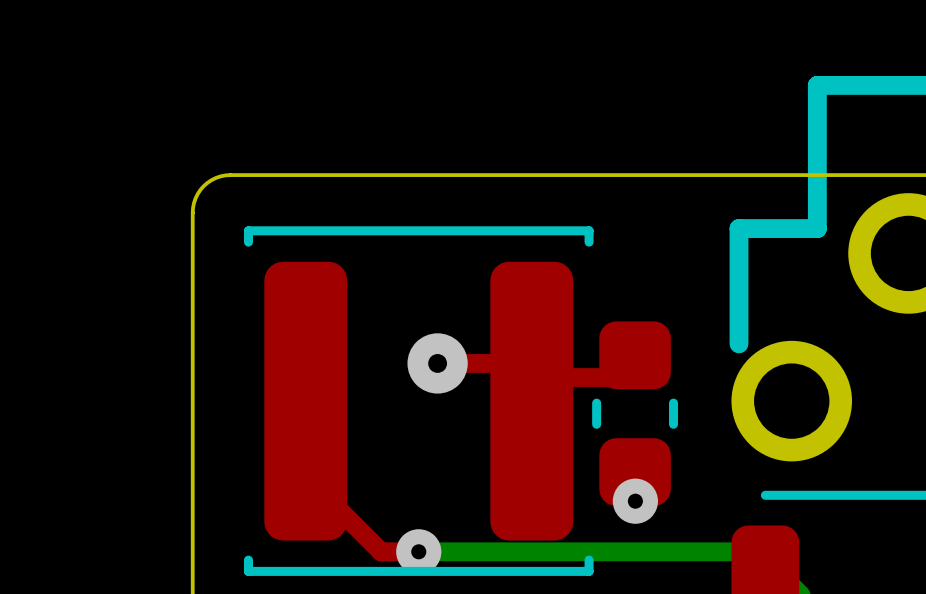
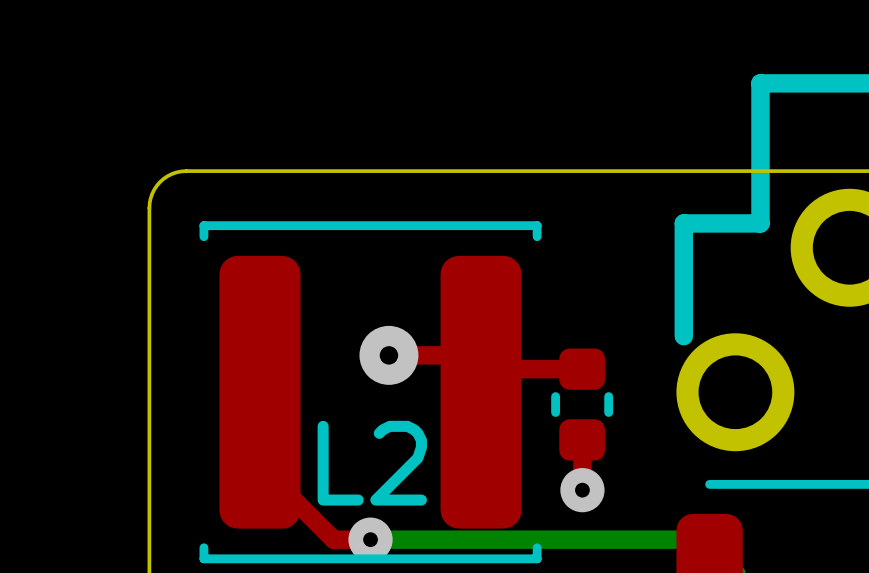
part footprint: [592, 321, 679, 507] -> [551, 348, 614, 461]
L2 name: none -> L2 (372, 463)

